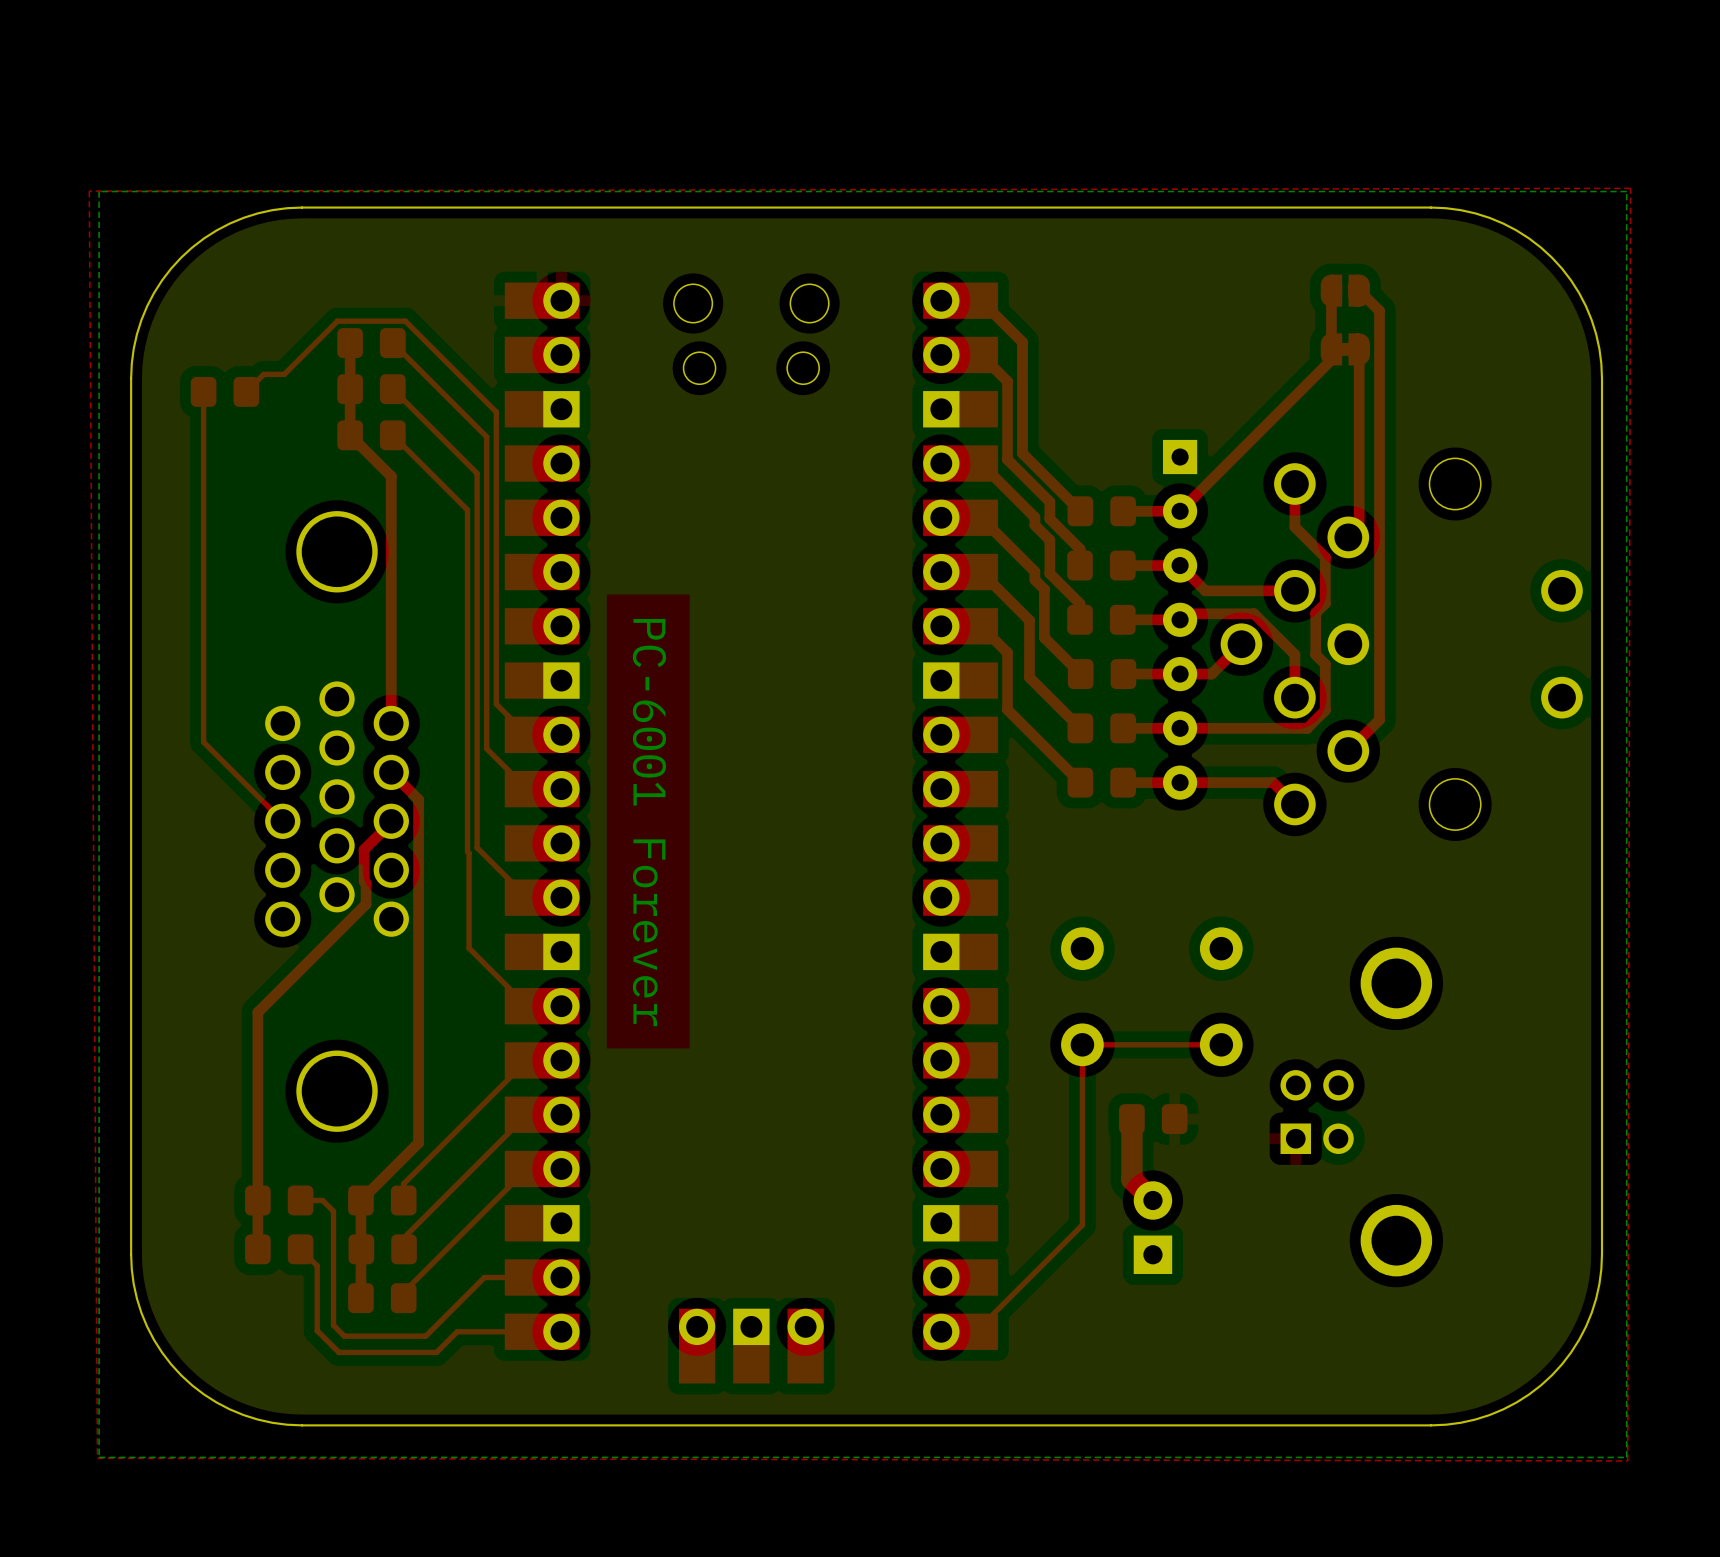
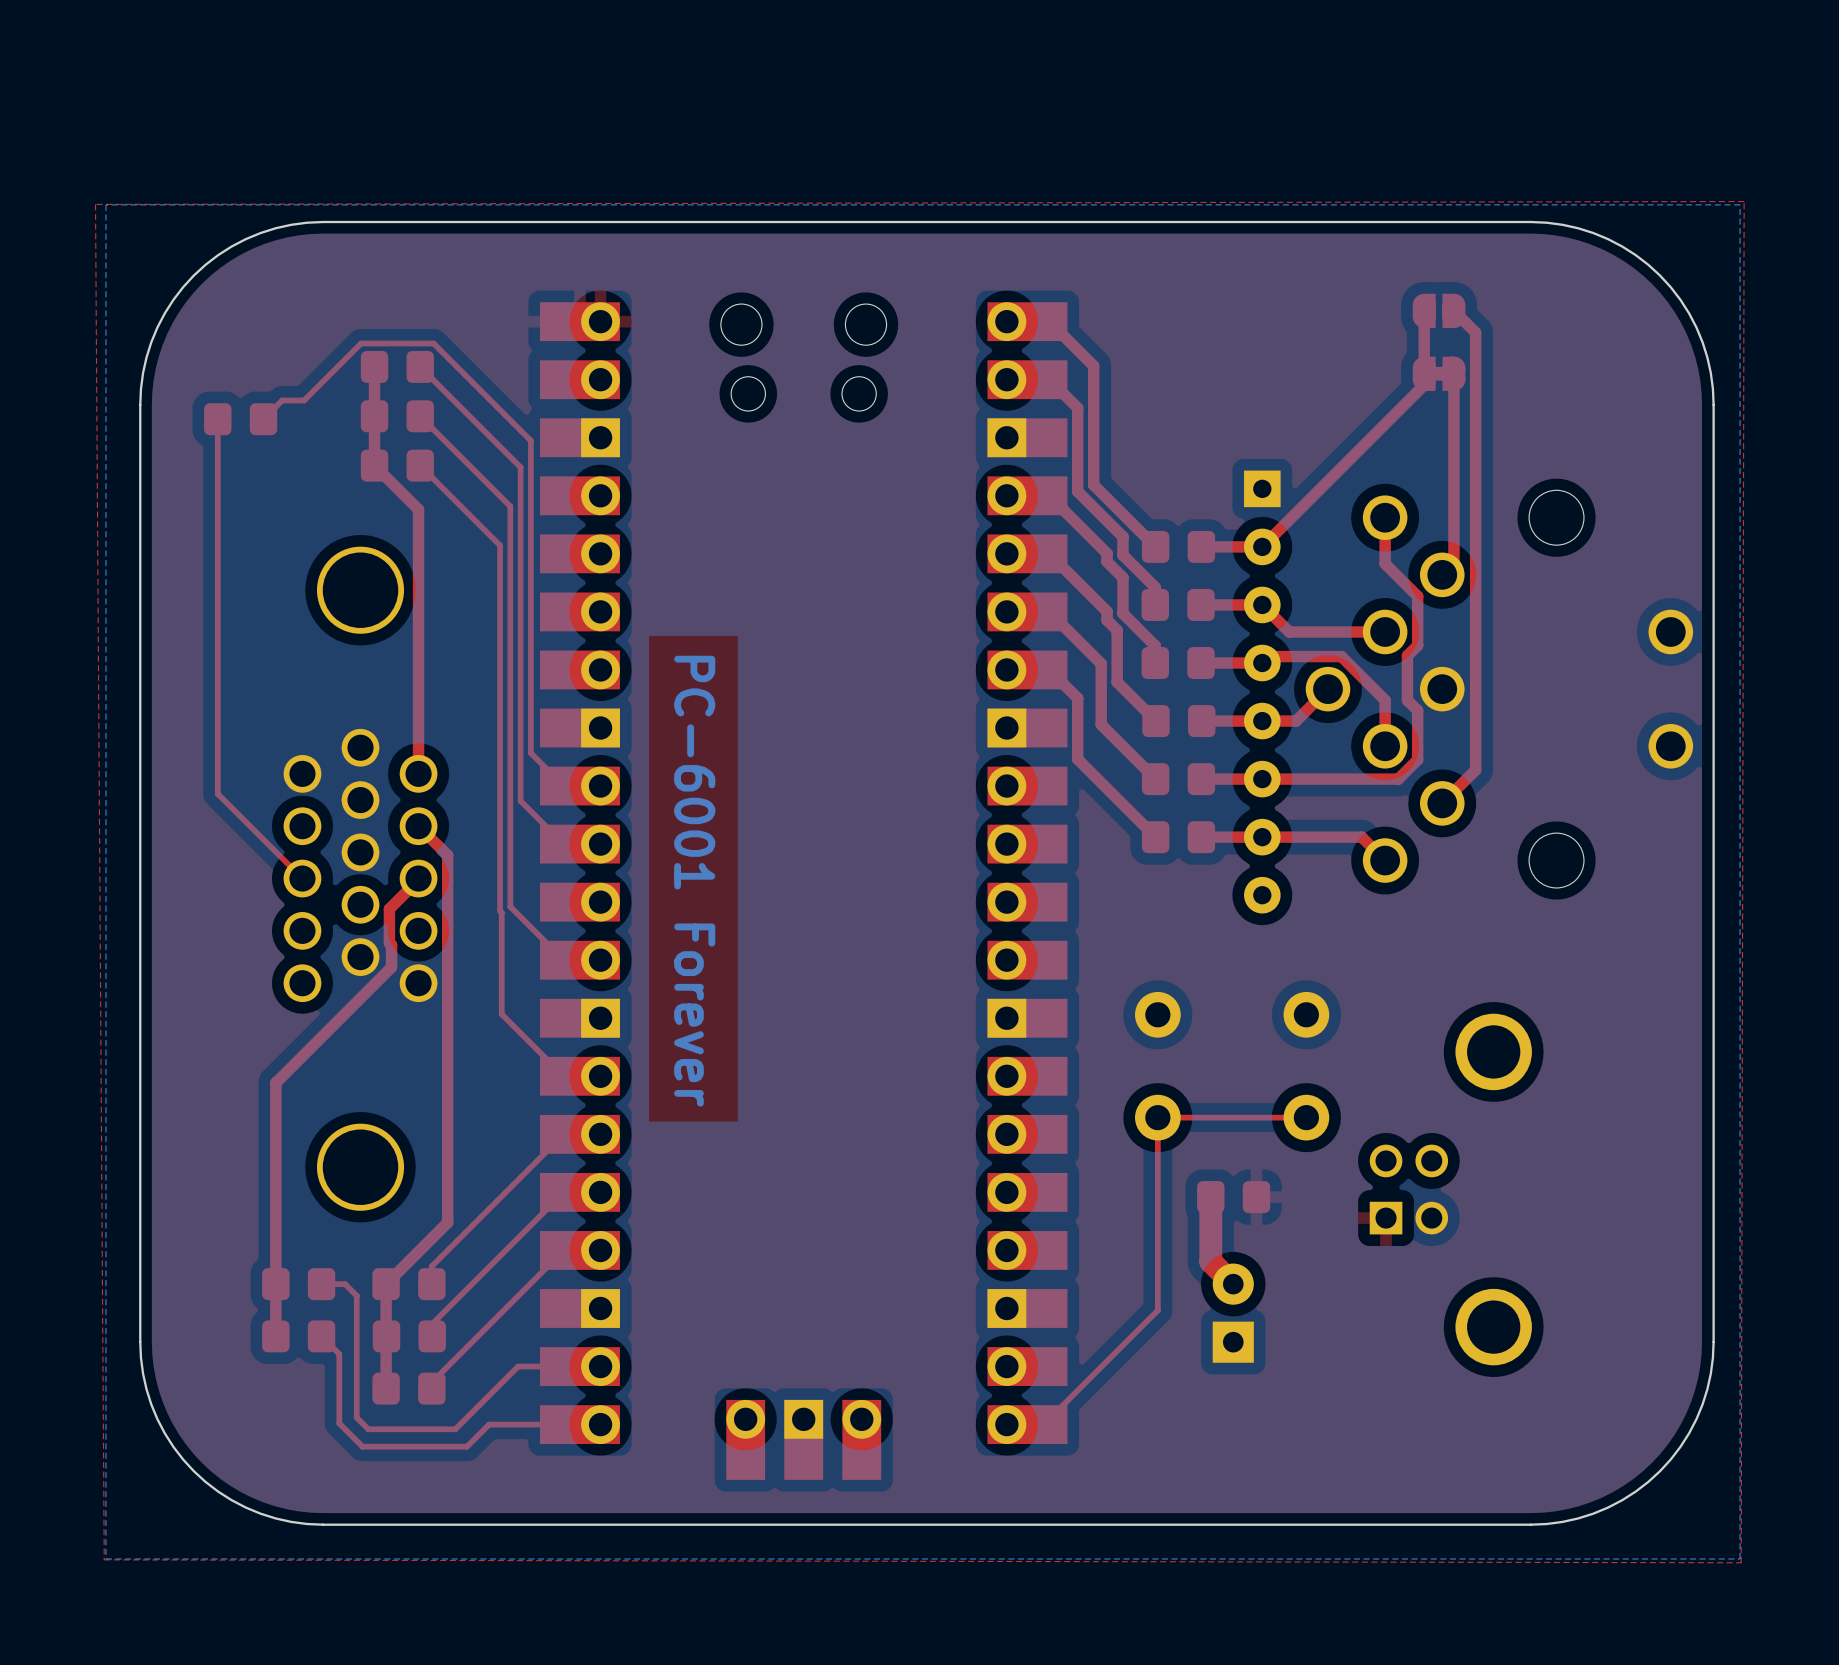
part: none -> (1262, 692)

